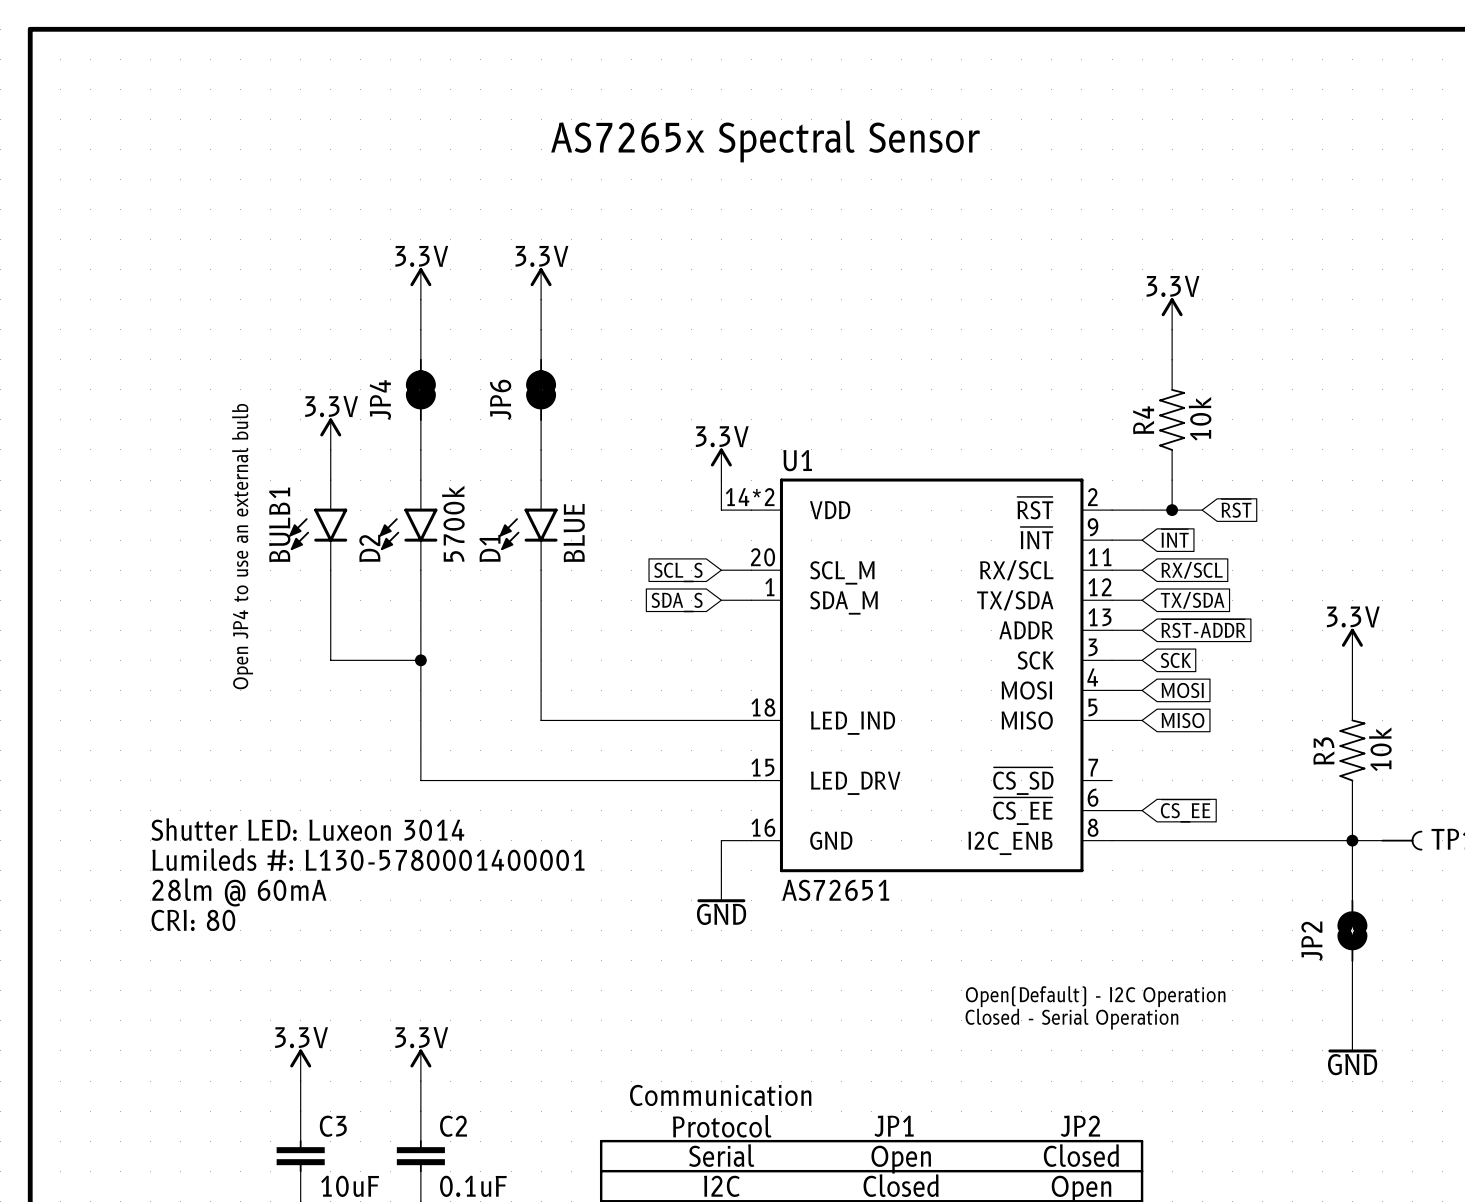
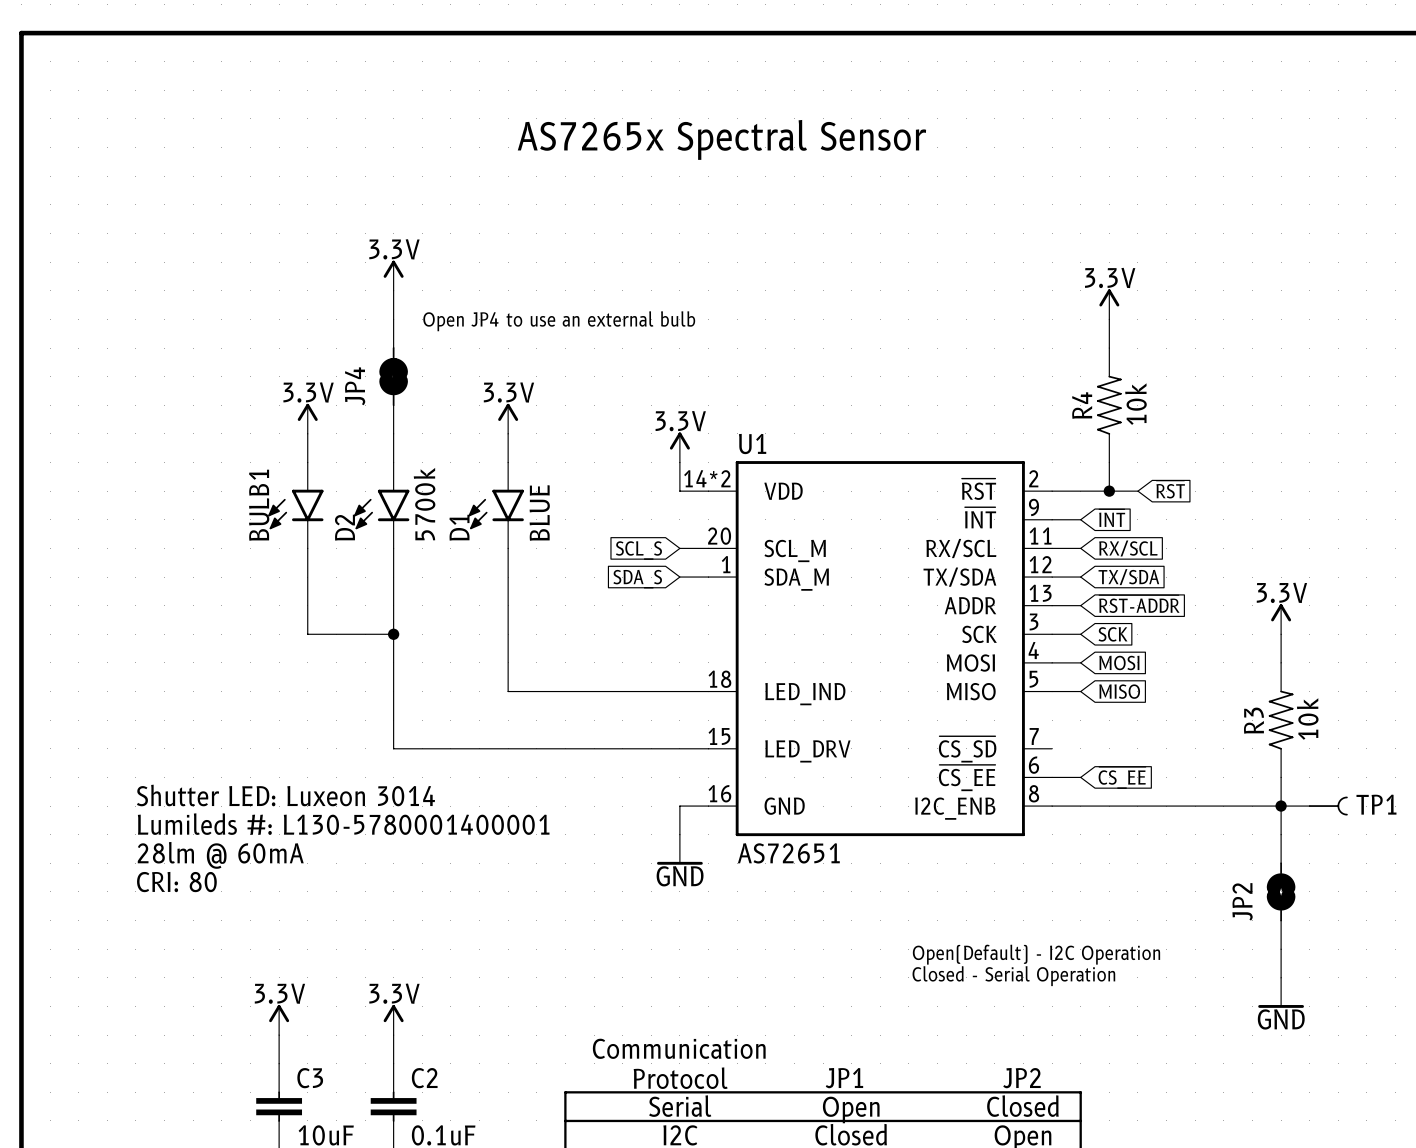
power symbol position: 3.3V (541, 283) -> 3.3V (508, 418)
wire: (541, 299) (541, 329) -> none
text: none -> Open JP4 to use an external bulb (559, 321)
JP6: (541, 389) -> none
text: Open JP4 to use an external bulb (242, 546) -> none

